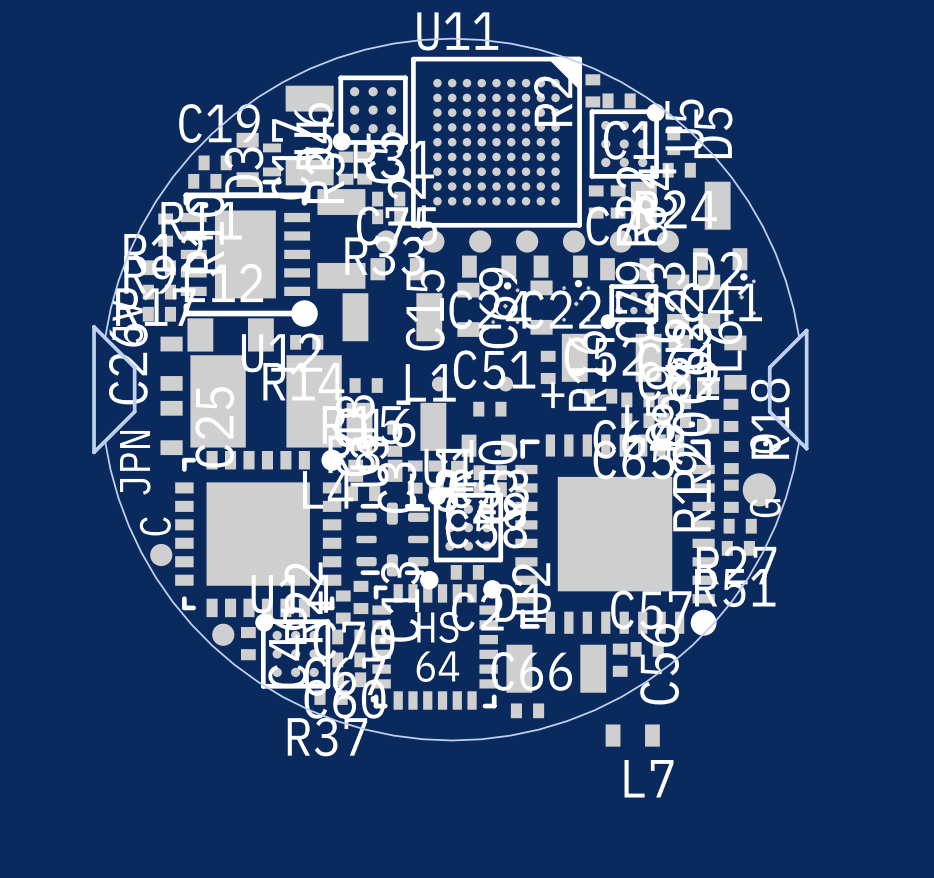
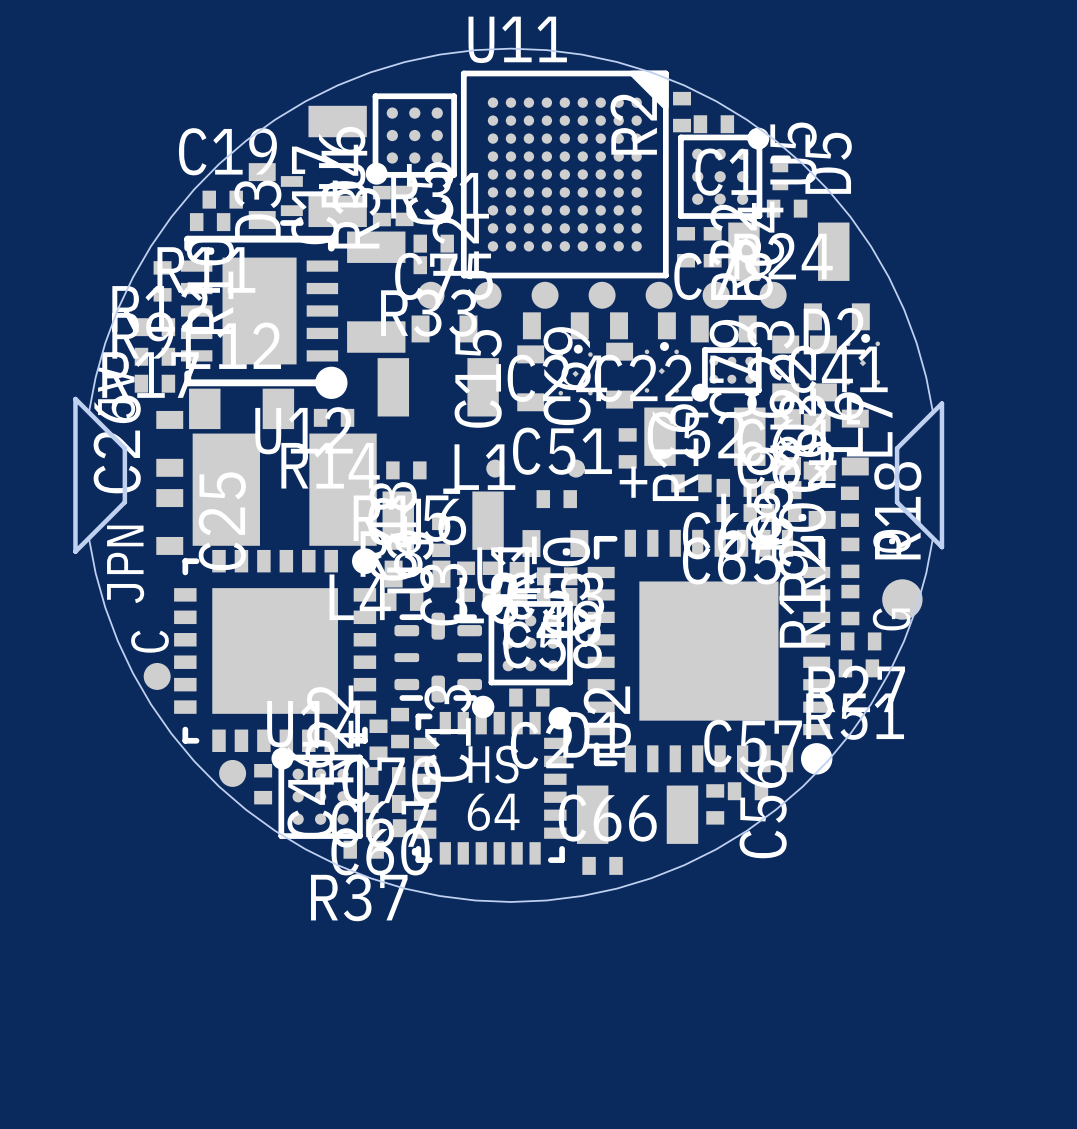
part position: (759, 489) -> (902, 599)
L7 rotation: 0° (632, 735) -> 90° clockwise (817, 446)
L7 position: (632, 735) -> (817, 446)

